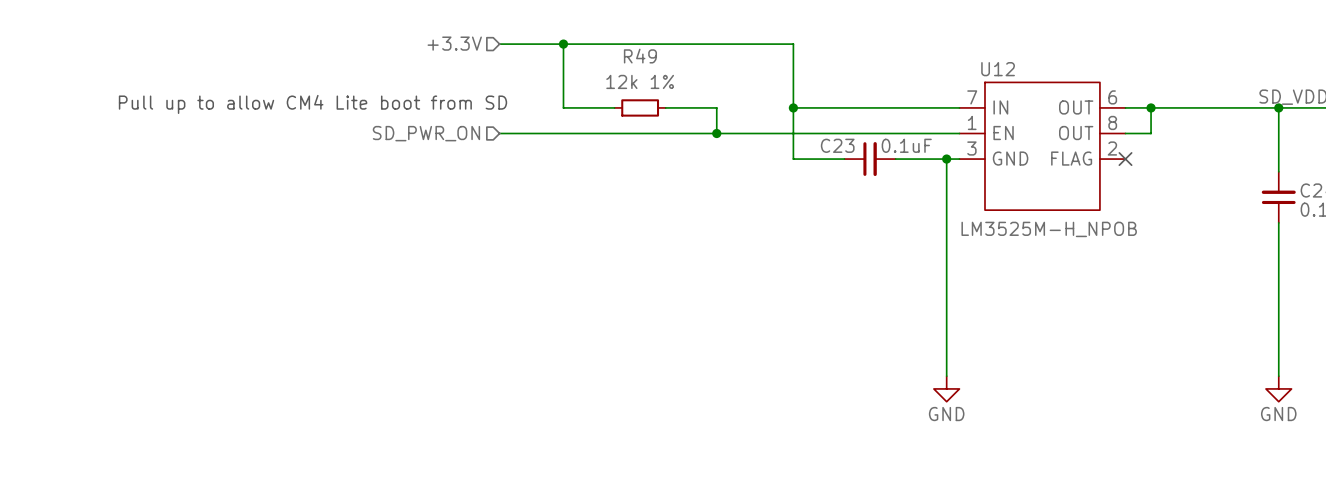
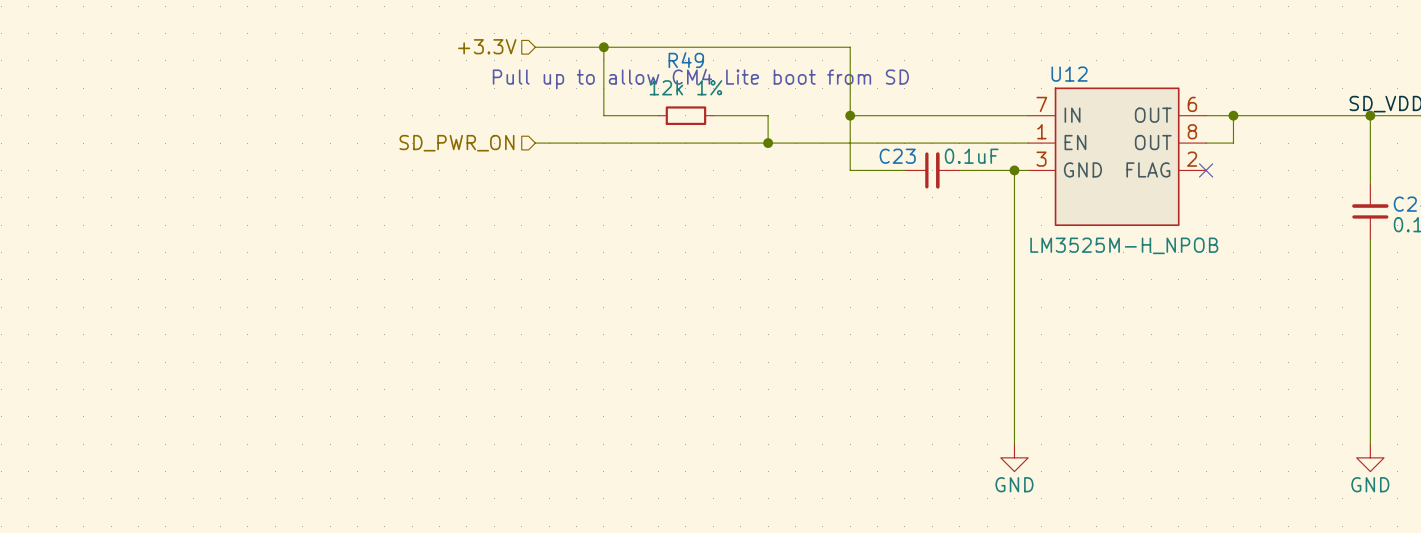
text: none -> Pull up to allow CM4 Lite boot from SD (700, 79)
text: Pull up to allow CM4 Lite boot from SD (312, 104) -> none
wire: none -> (1014, 403) (1014, 444)
wire: none -> (1370, 403) (1370, 444)
power symbol position: GND (946, 388) -> GND (1014, 457)
power symbol position: GND (1278, 388) -> GND (1370, 457)

